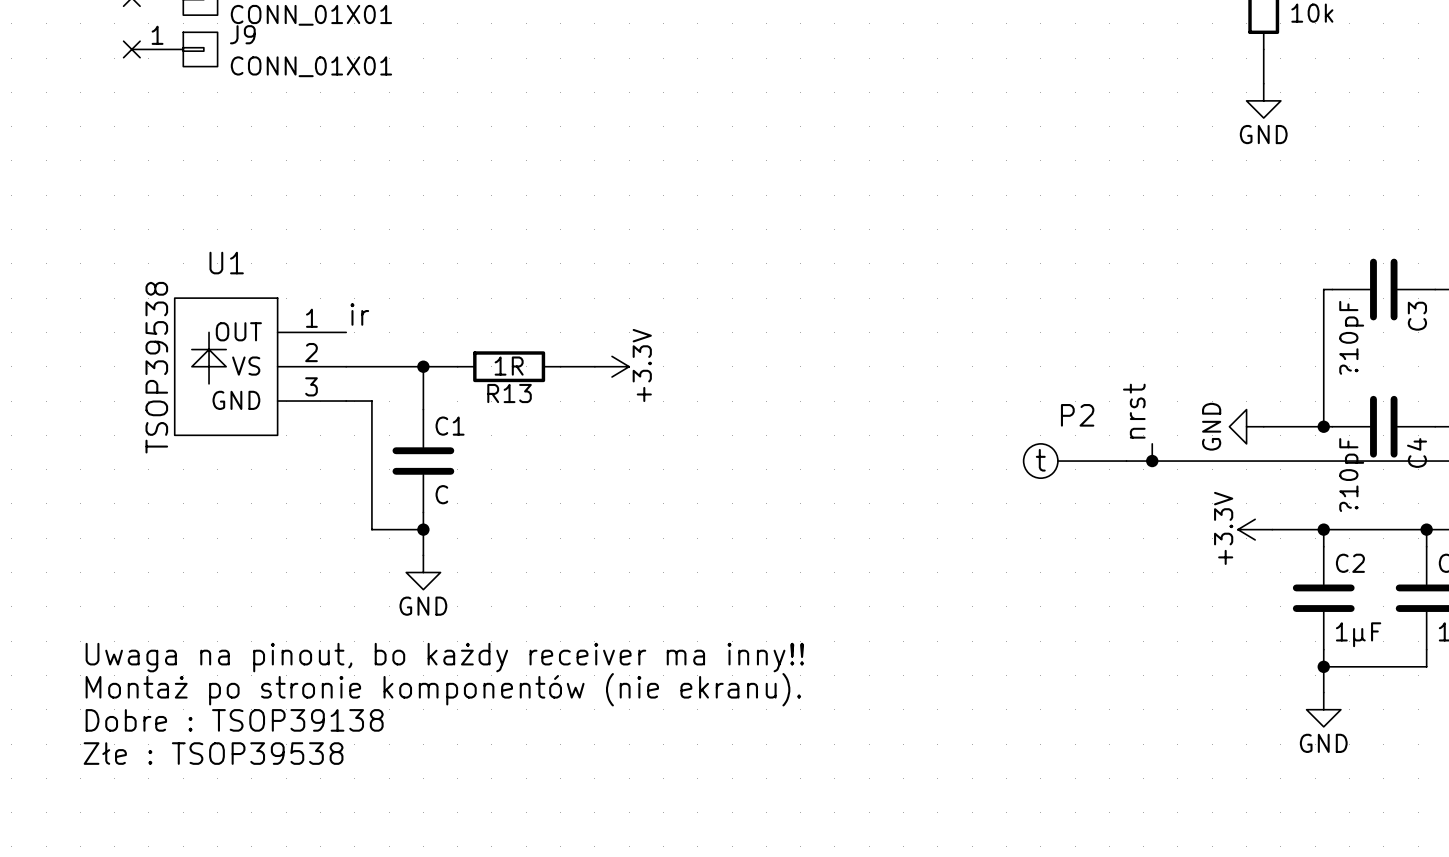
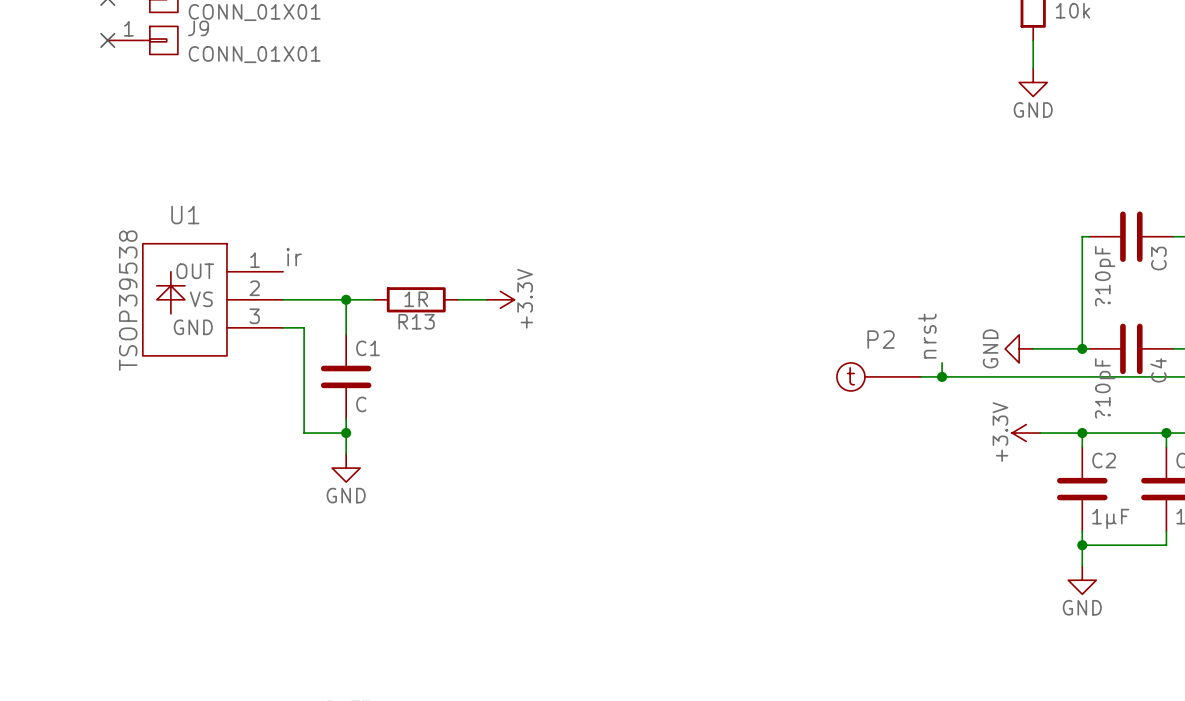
text: Uwaga na pinout, bo każdy receiver ma inny!! (444, 657) -> none
text: Montaż po stronie komponentów (nie ekranu). (443, 689) -> none
text: Dobre : TSOP39138 (234, 720) -> none
text: Złe : TSOP39538 (213, 753) -> none

